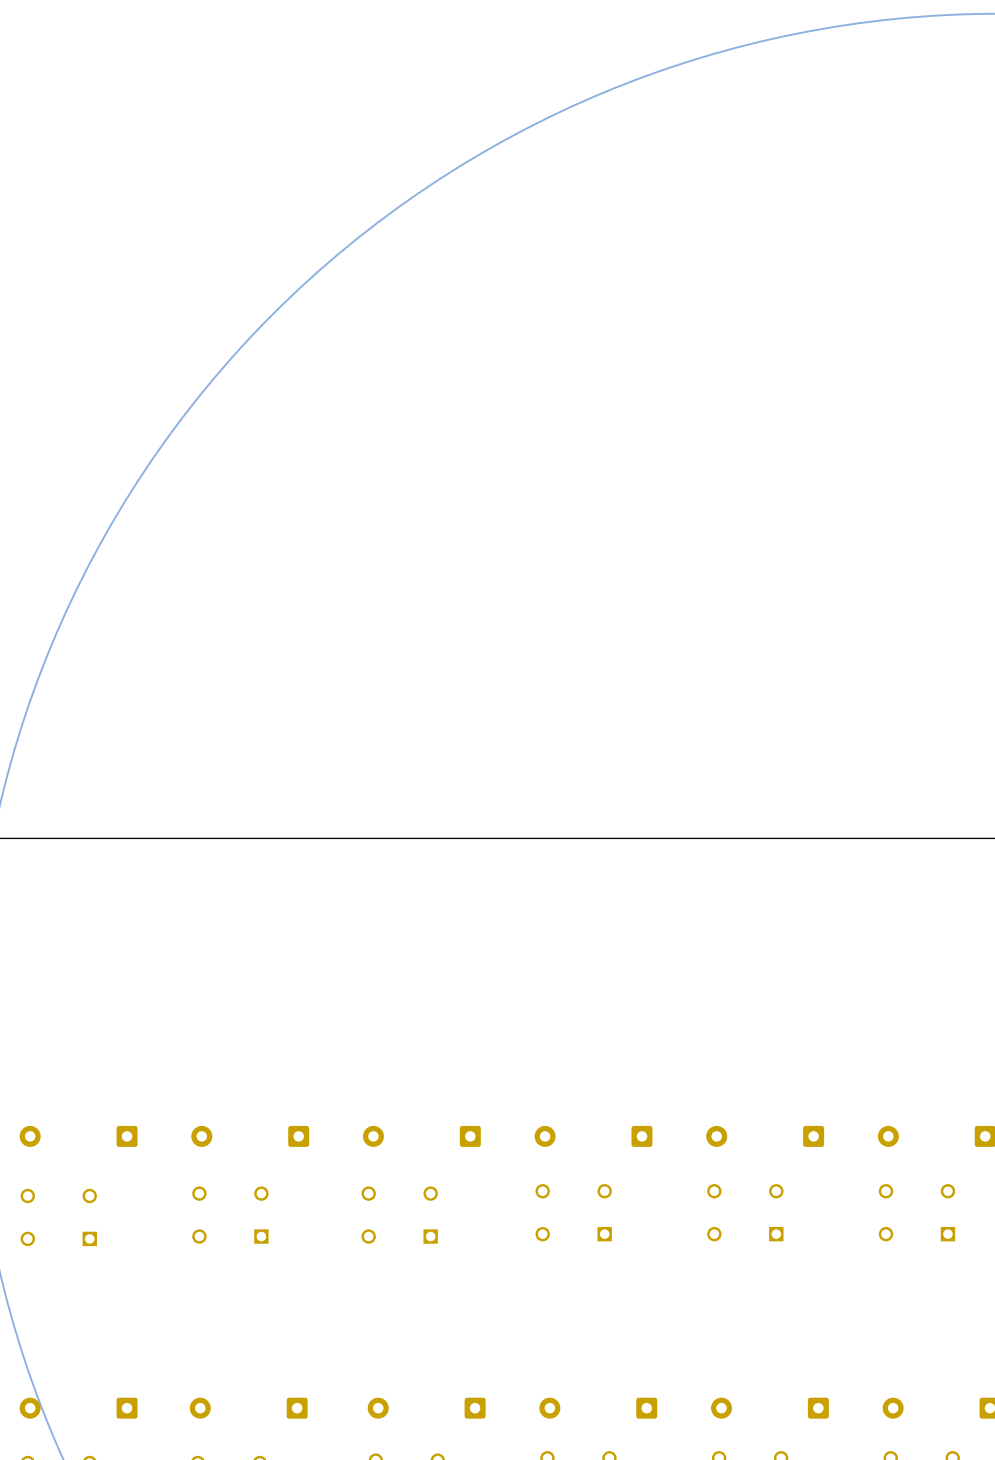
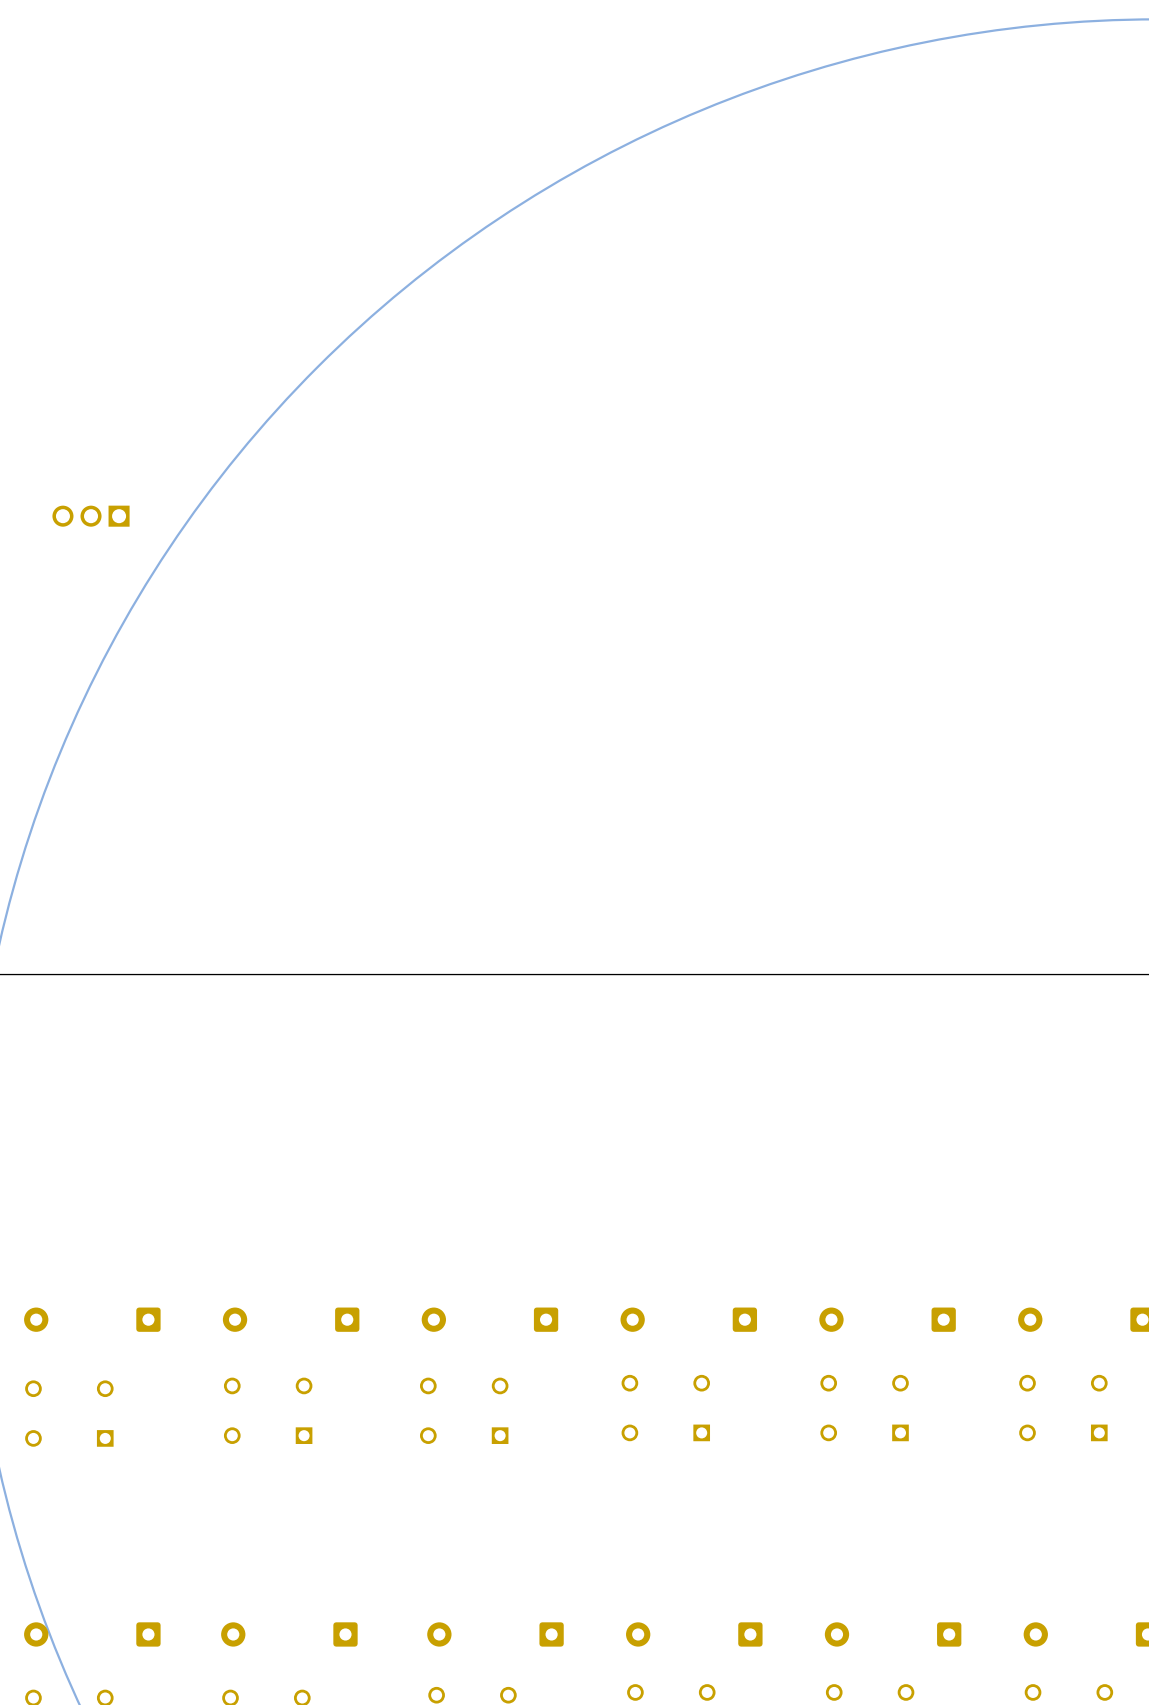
part: none -> (91, 516)

